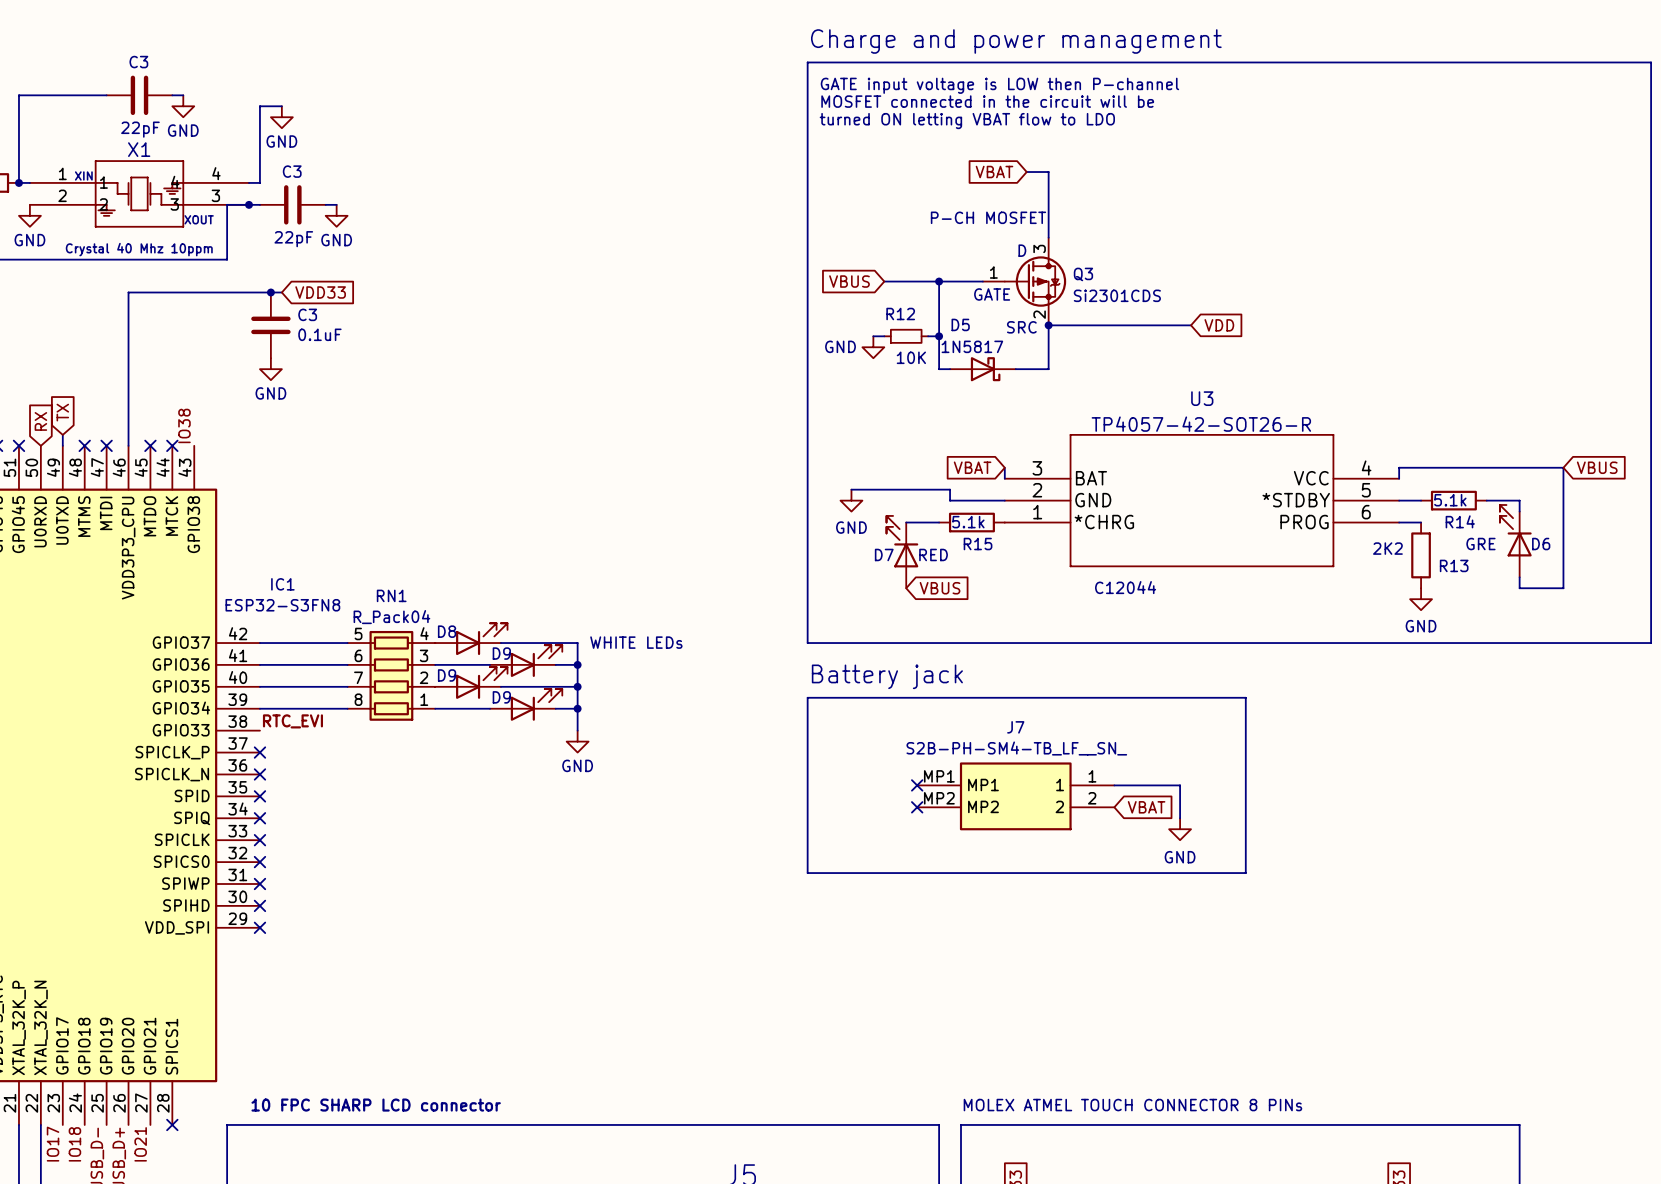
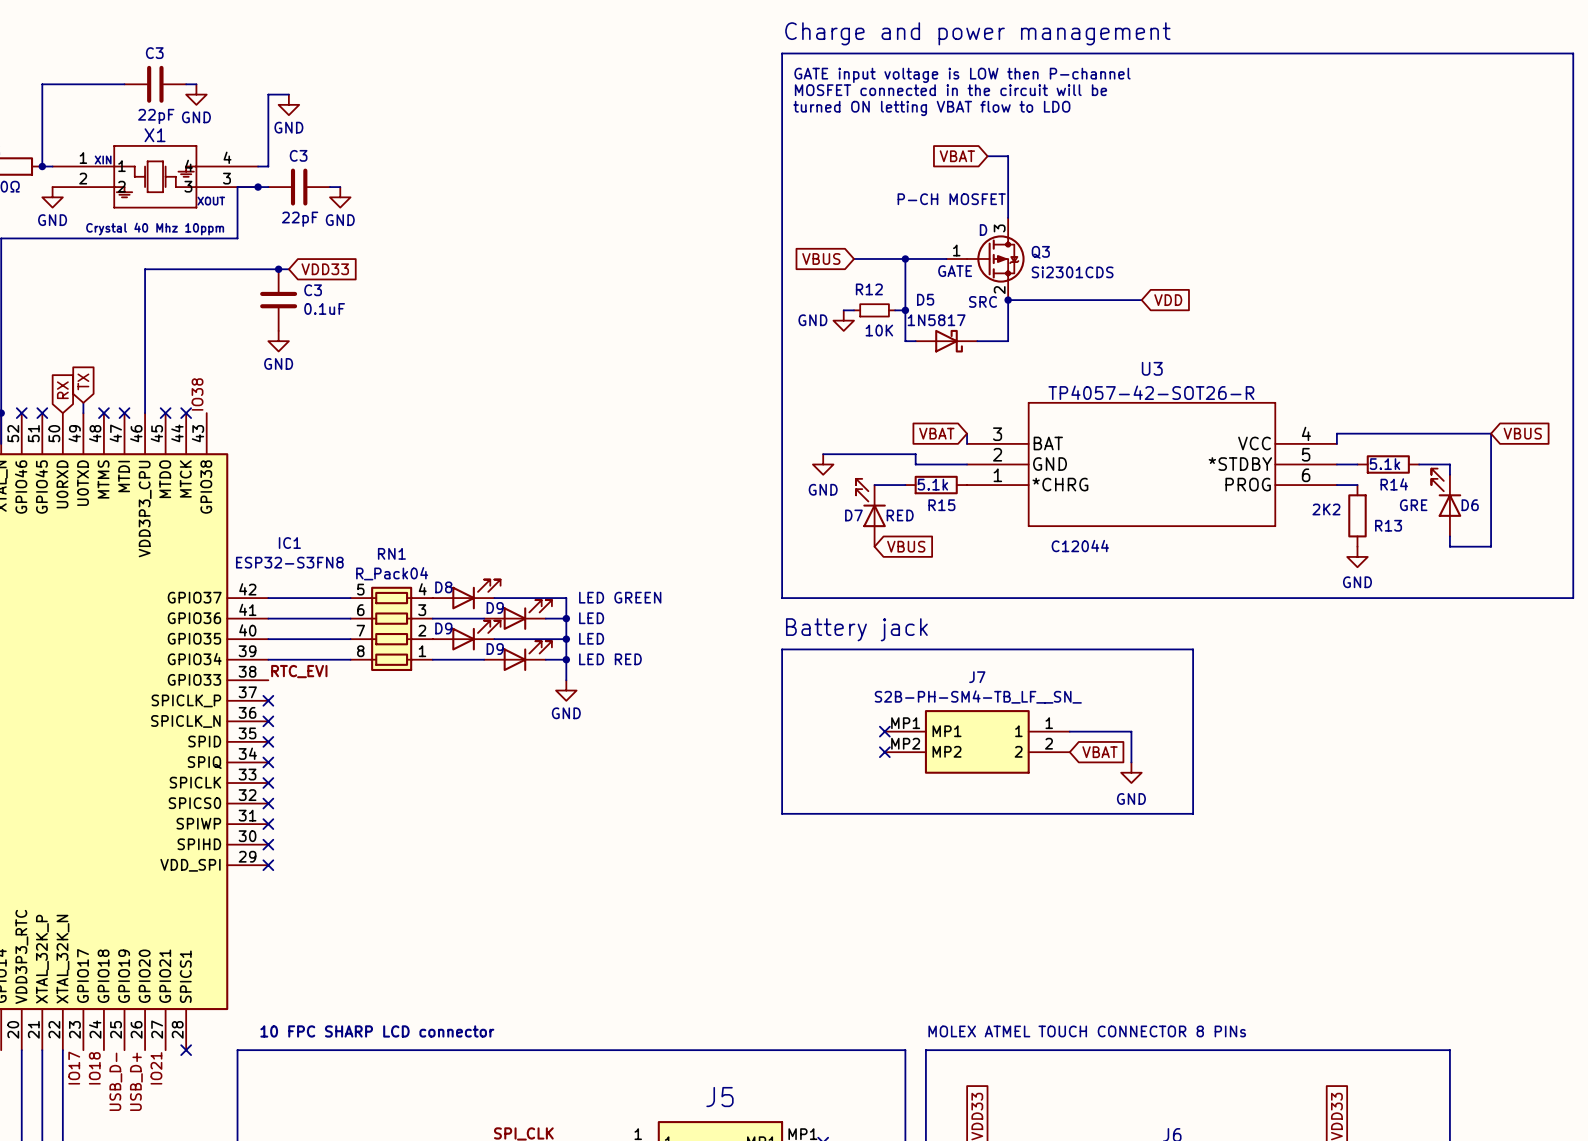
D8 value: WHITE LEDs (636, 642) -> LED GREEN (620, 597)
D9 value: none -> LED (591, 618)
D9 value: none -> LED (591, 638)
D9 value: none -> LED RED (610, 659)

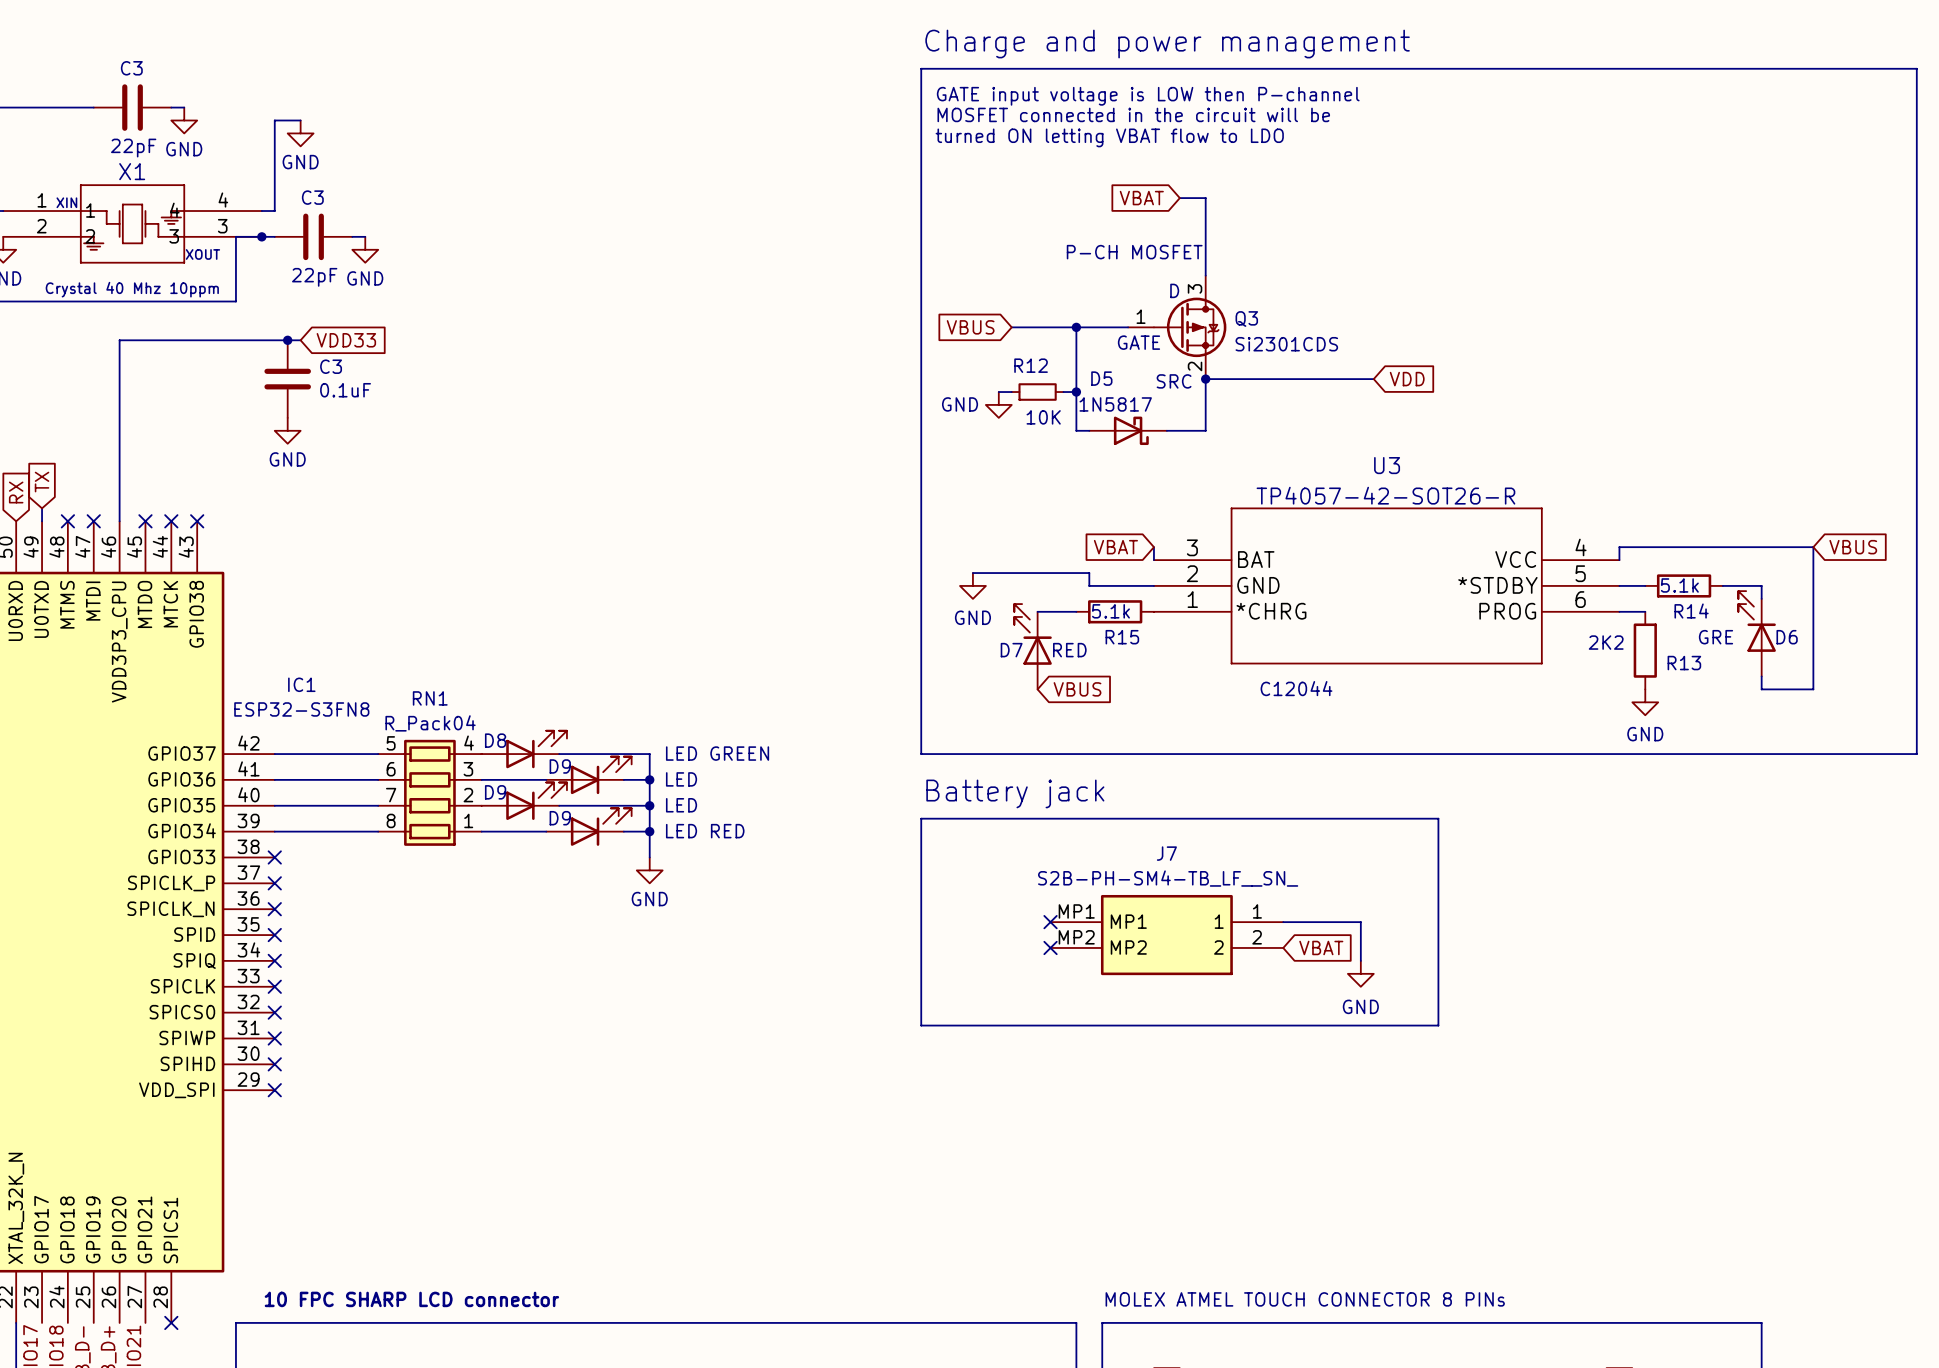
label: IO38 (197, 394) -> none
no-connect mark: none -> (197, 521)
label: RTC_EVI (299, 671) -> none
no-connect mark: none -> (274, 857)

